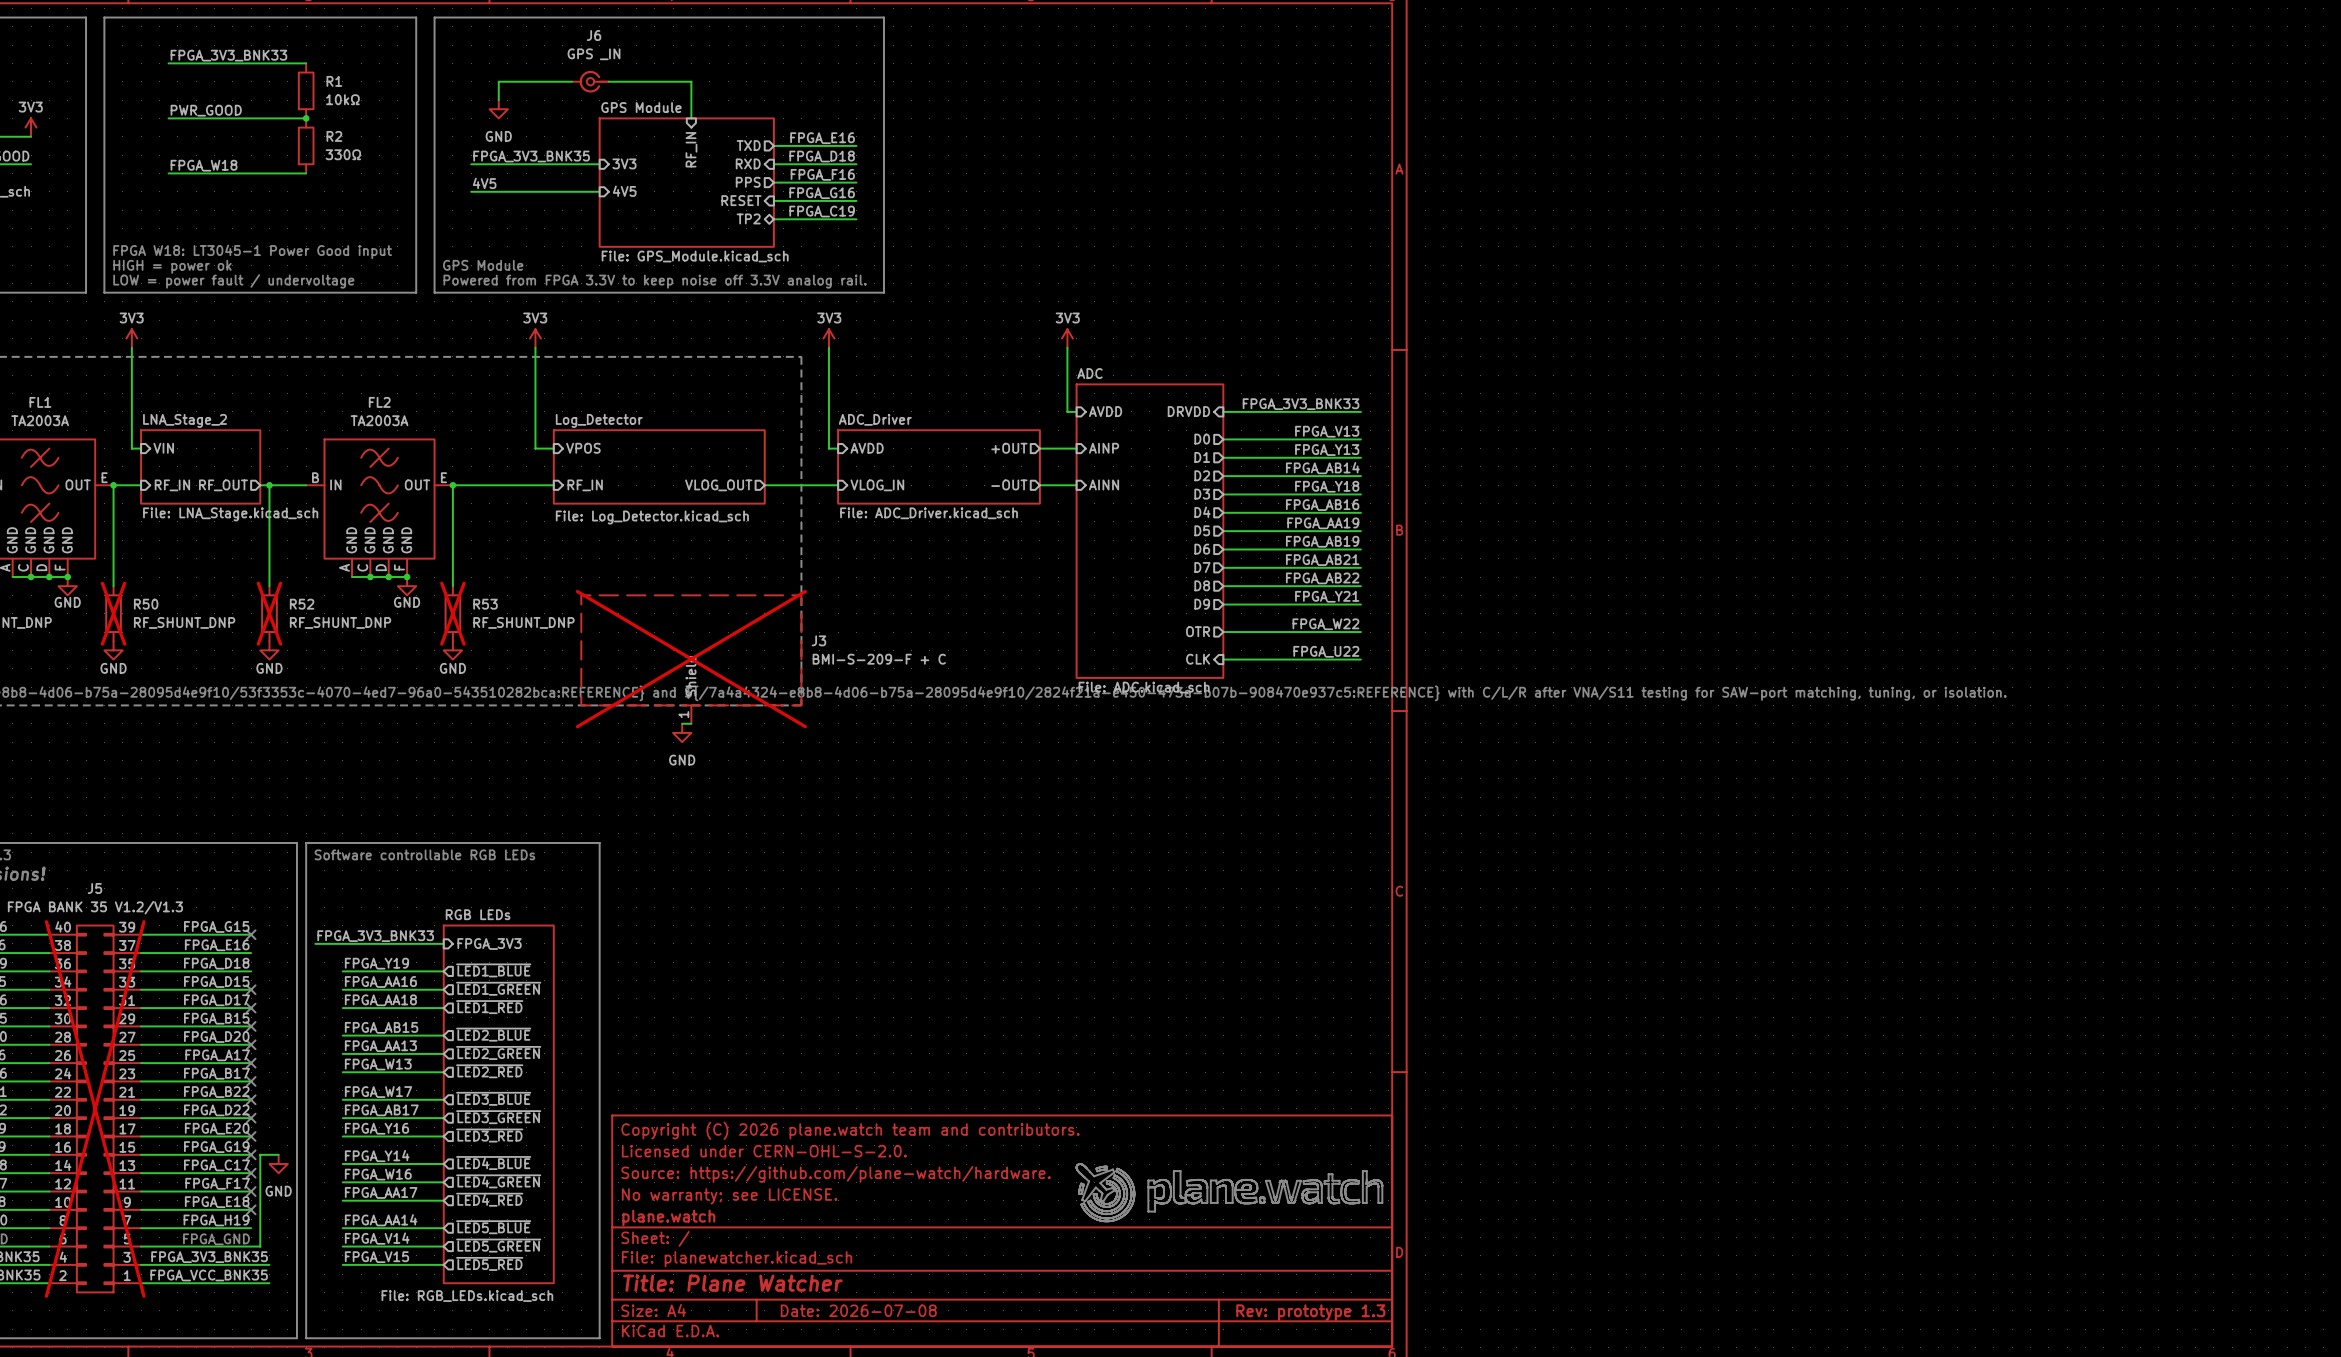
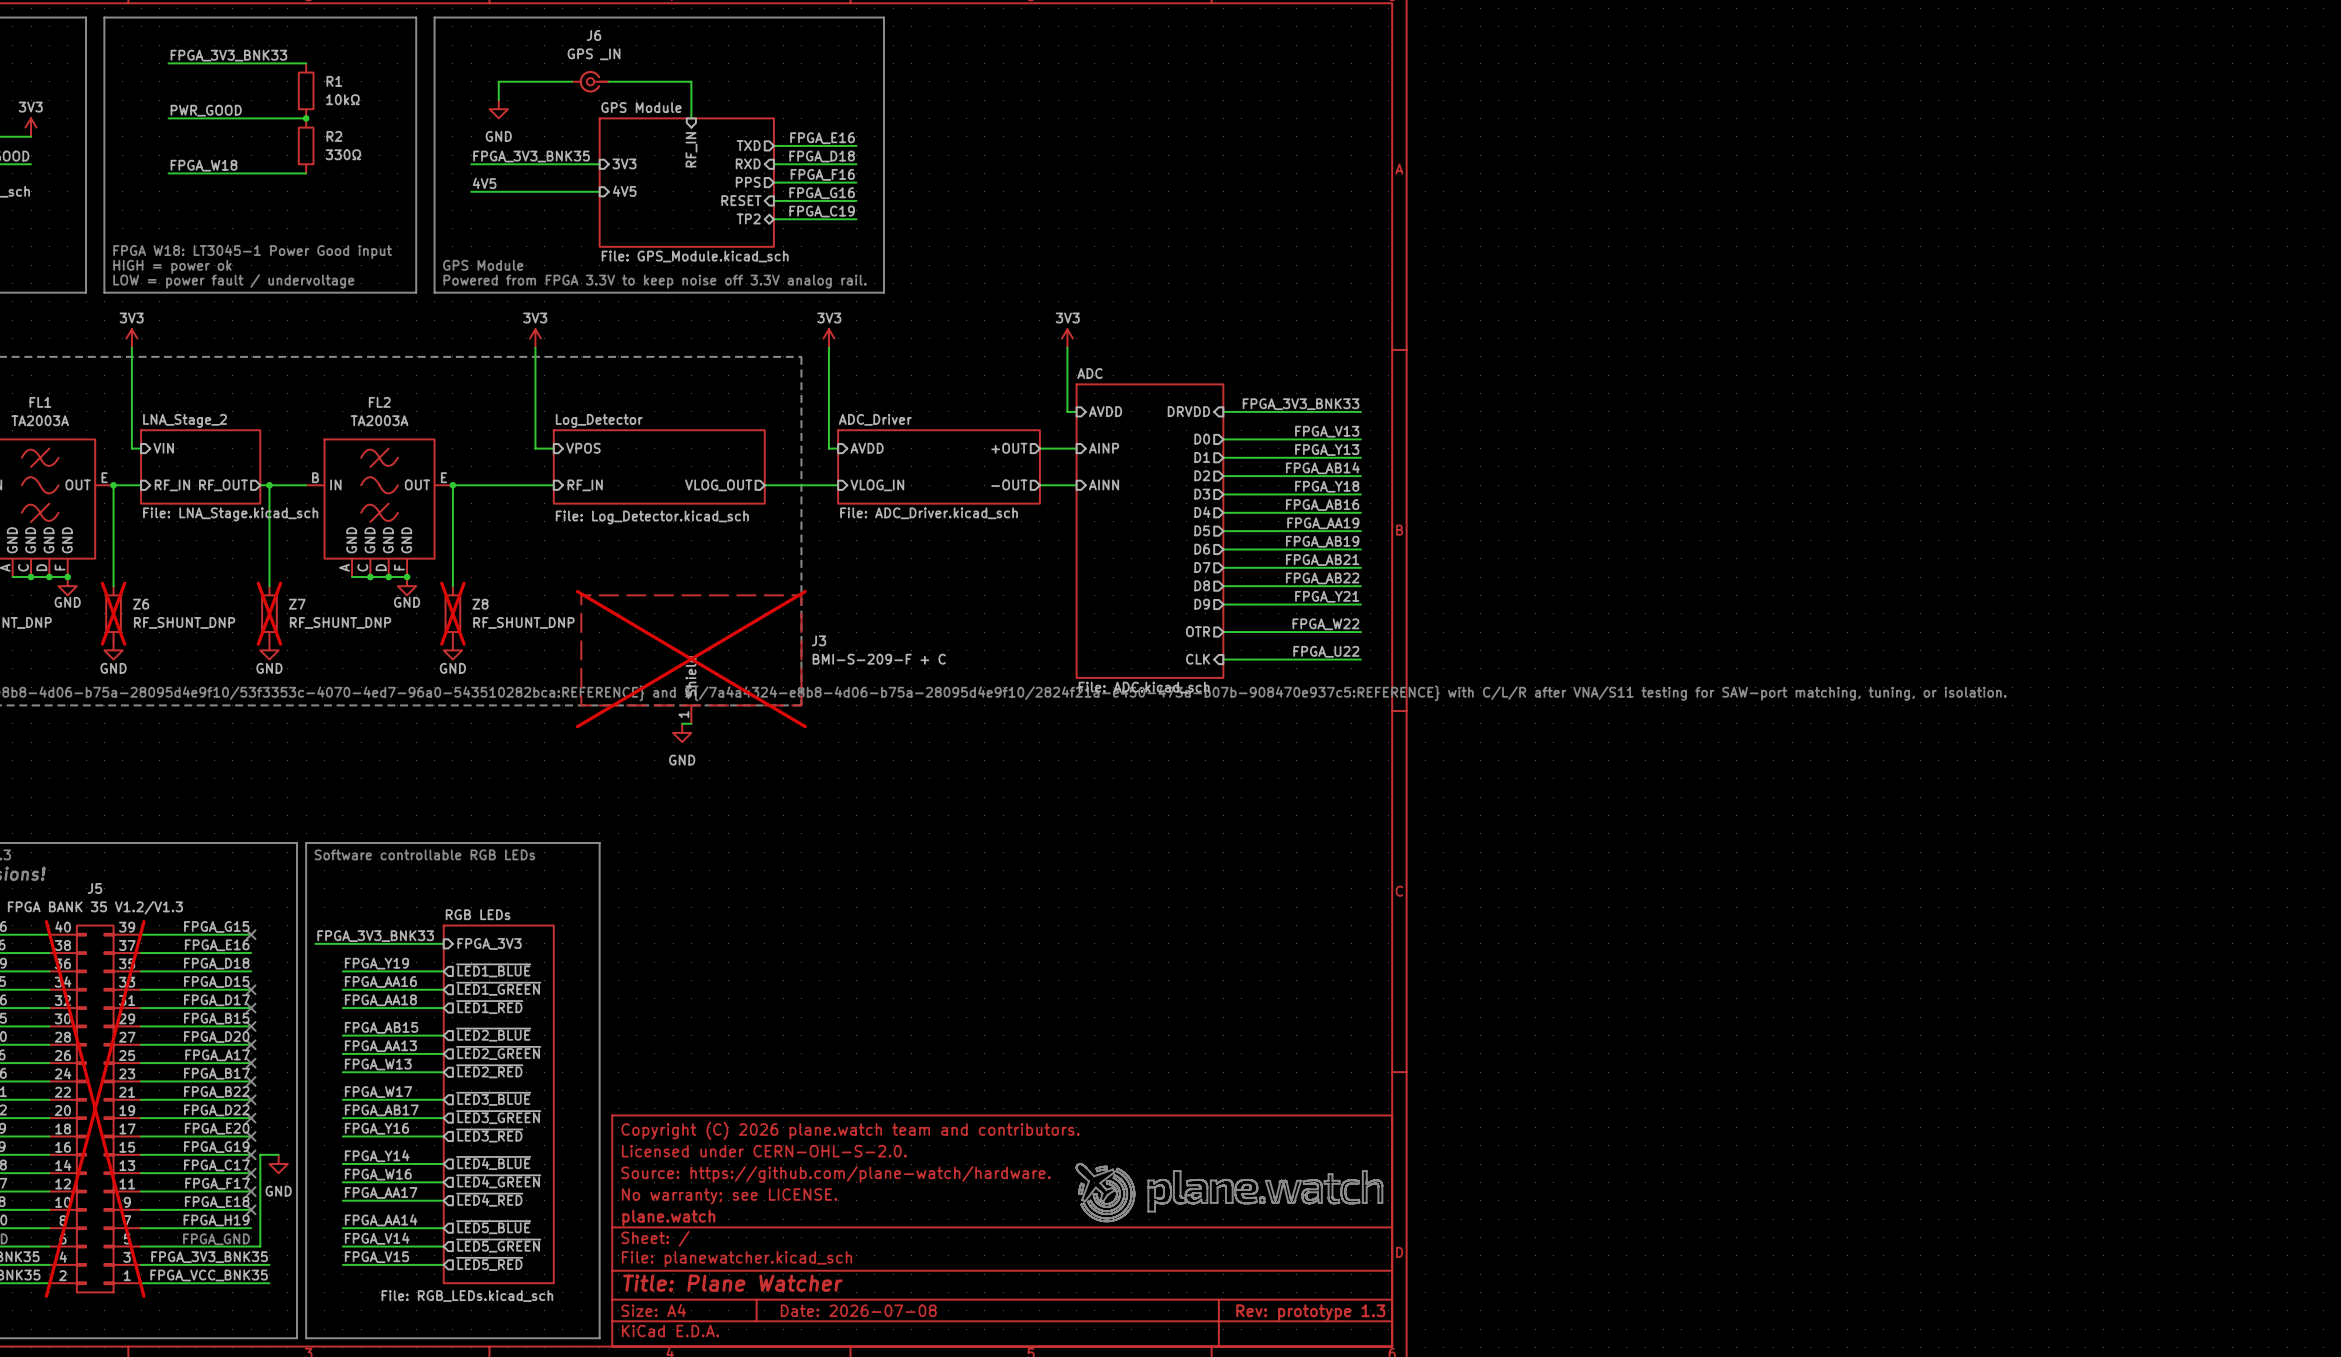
R50 name: R50 (146, 604) -> Z6 (141, 604)
R52 name: R52 (302, 604) -> Z7 (297, 604)
R53 name: R53 (485, 604) -> Z8 (480, 604)

